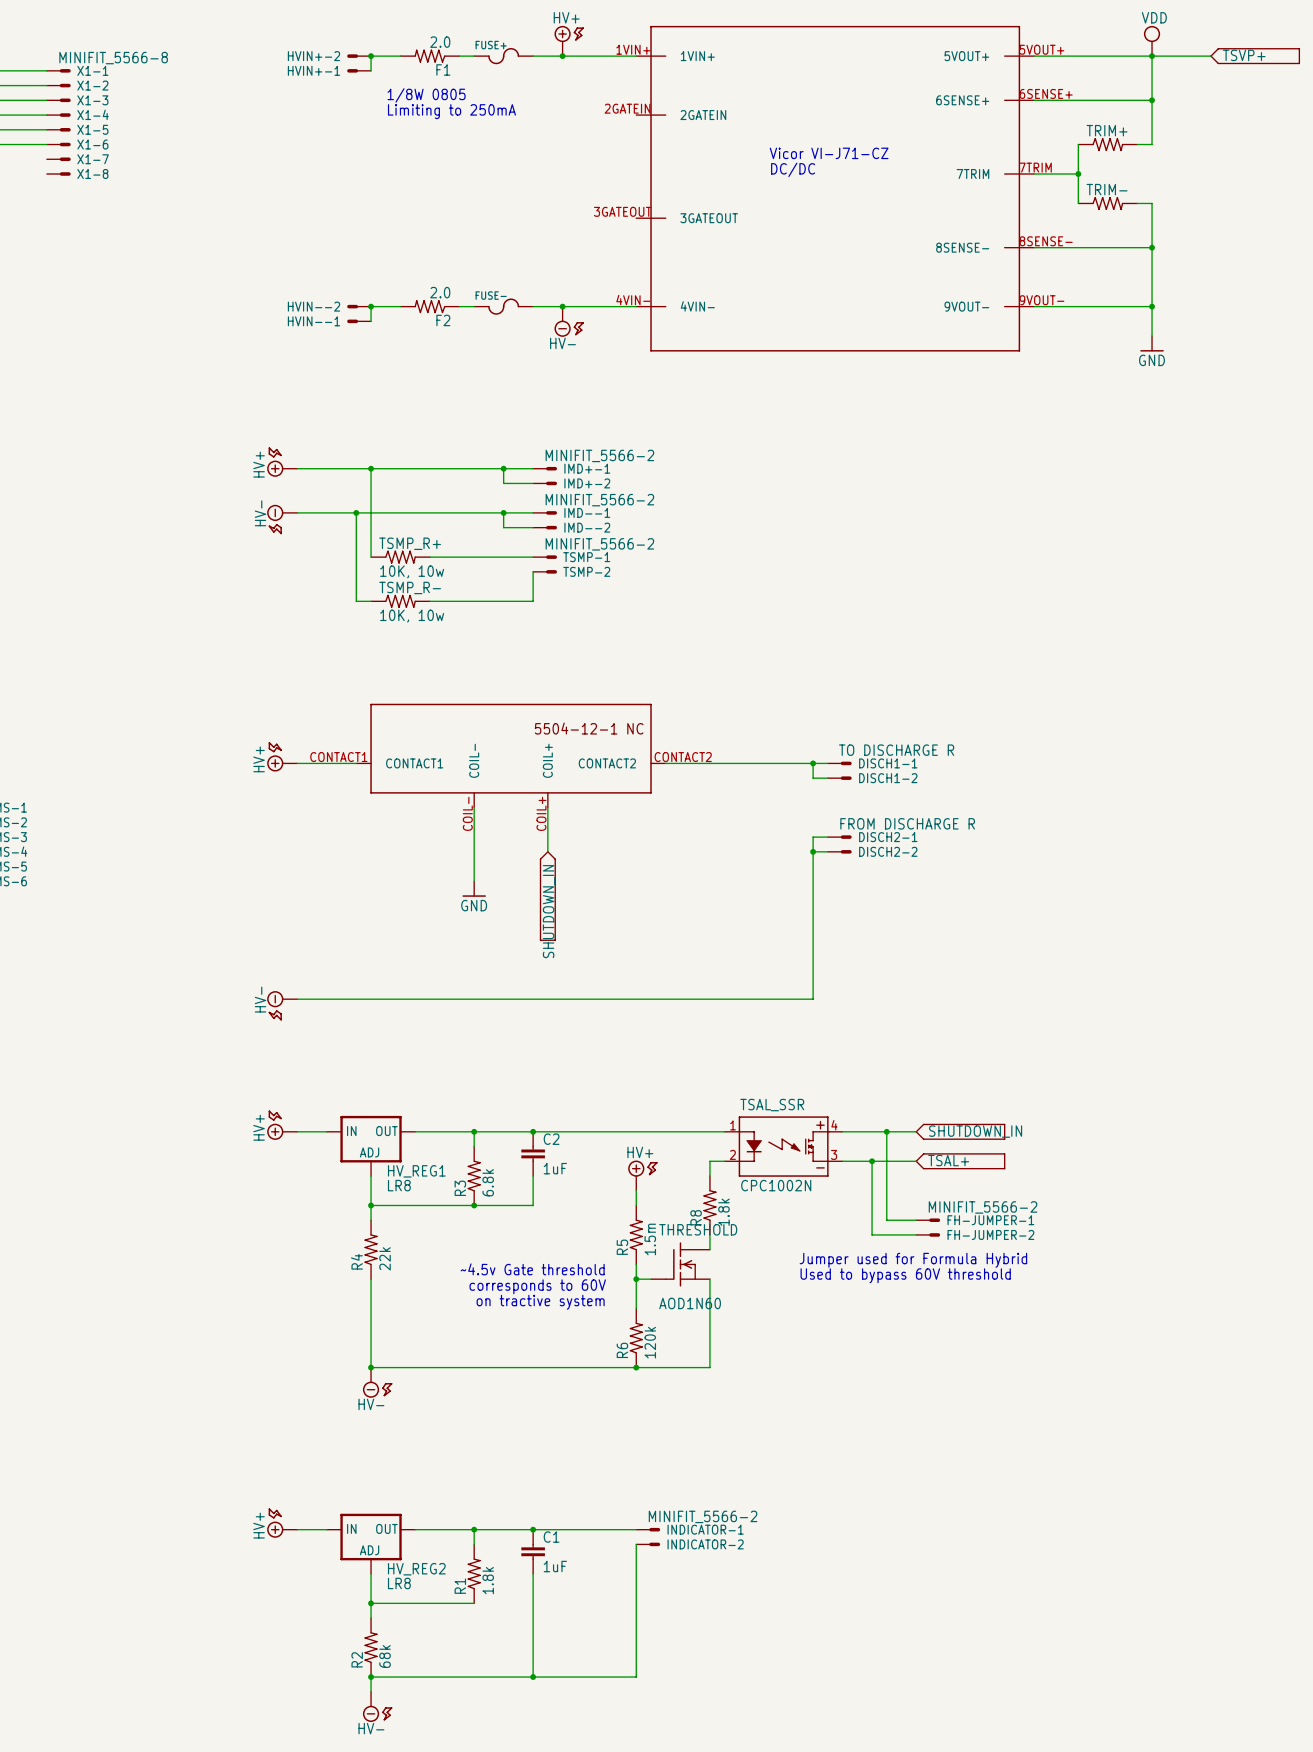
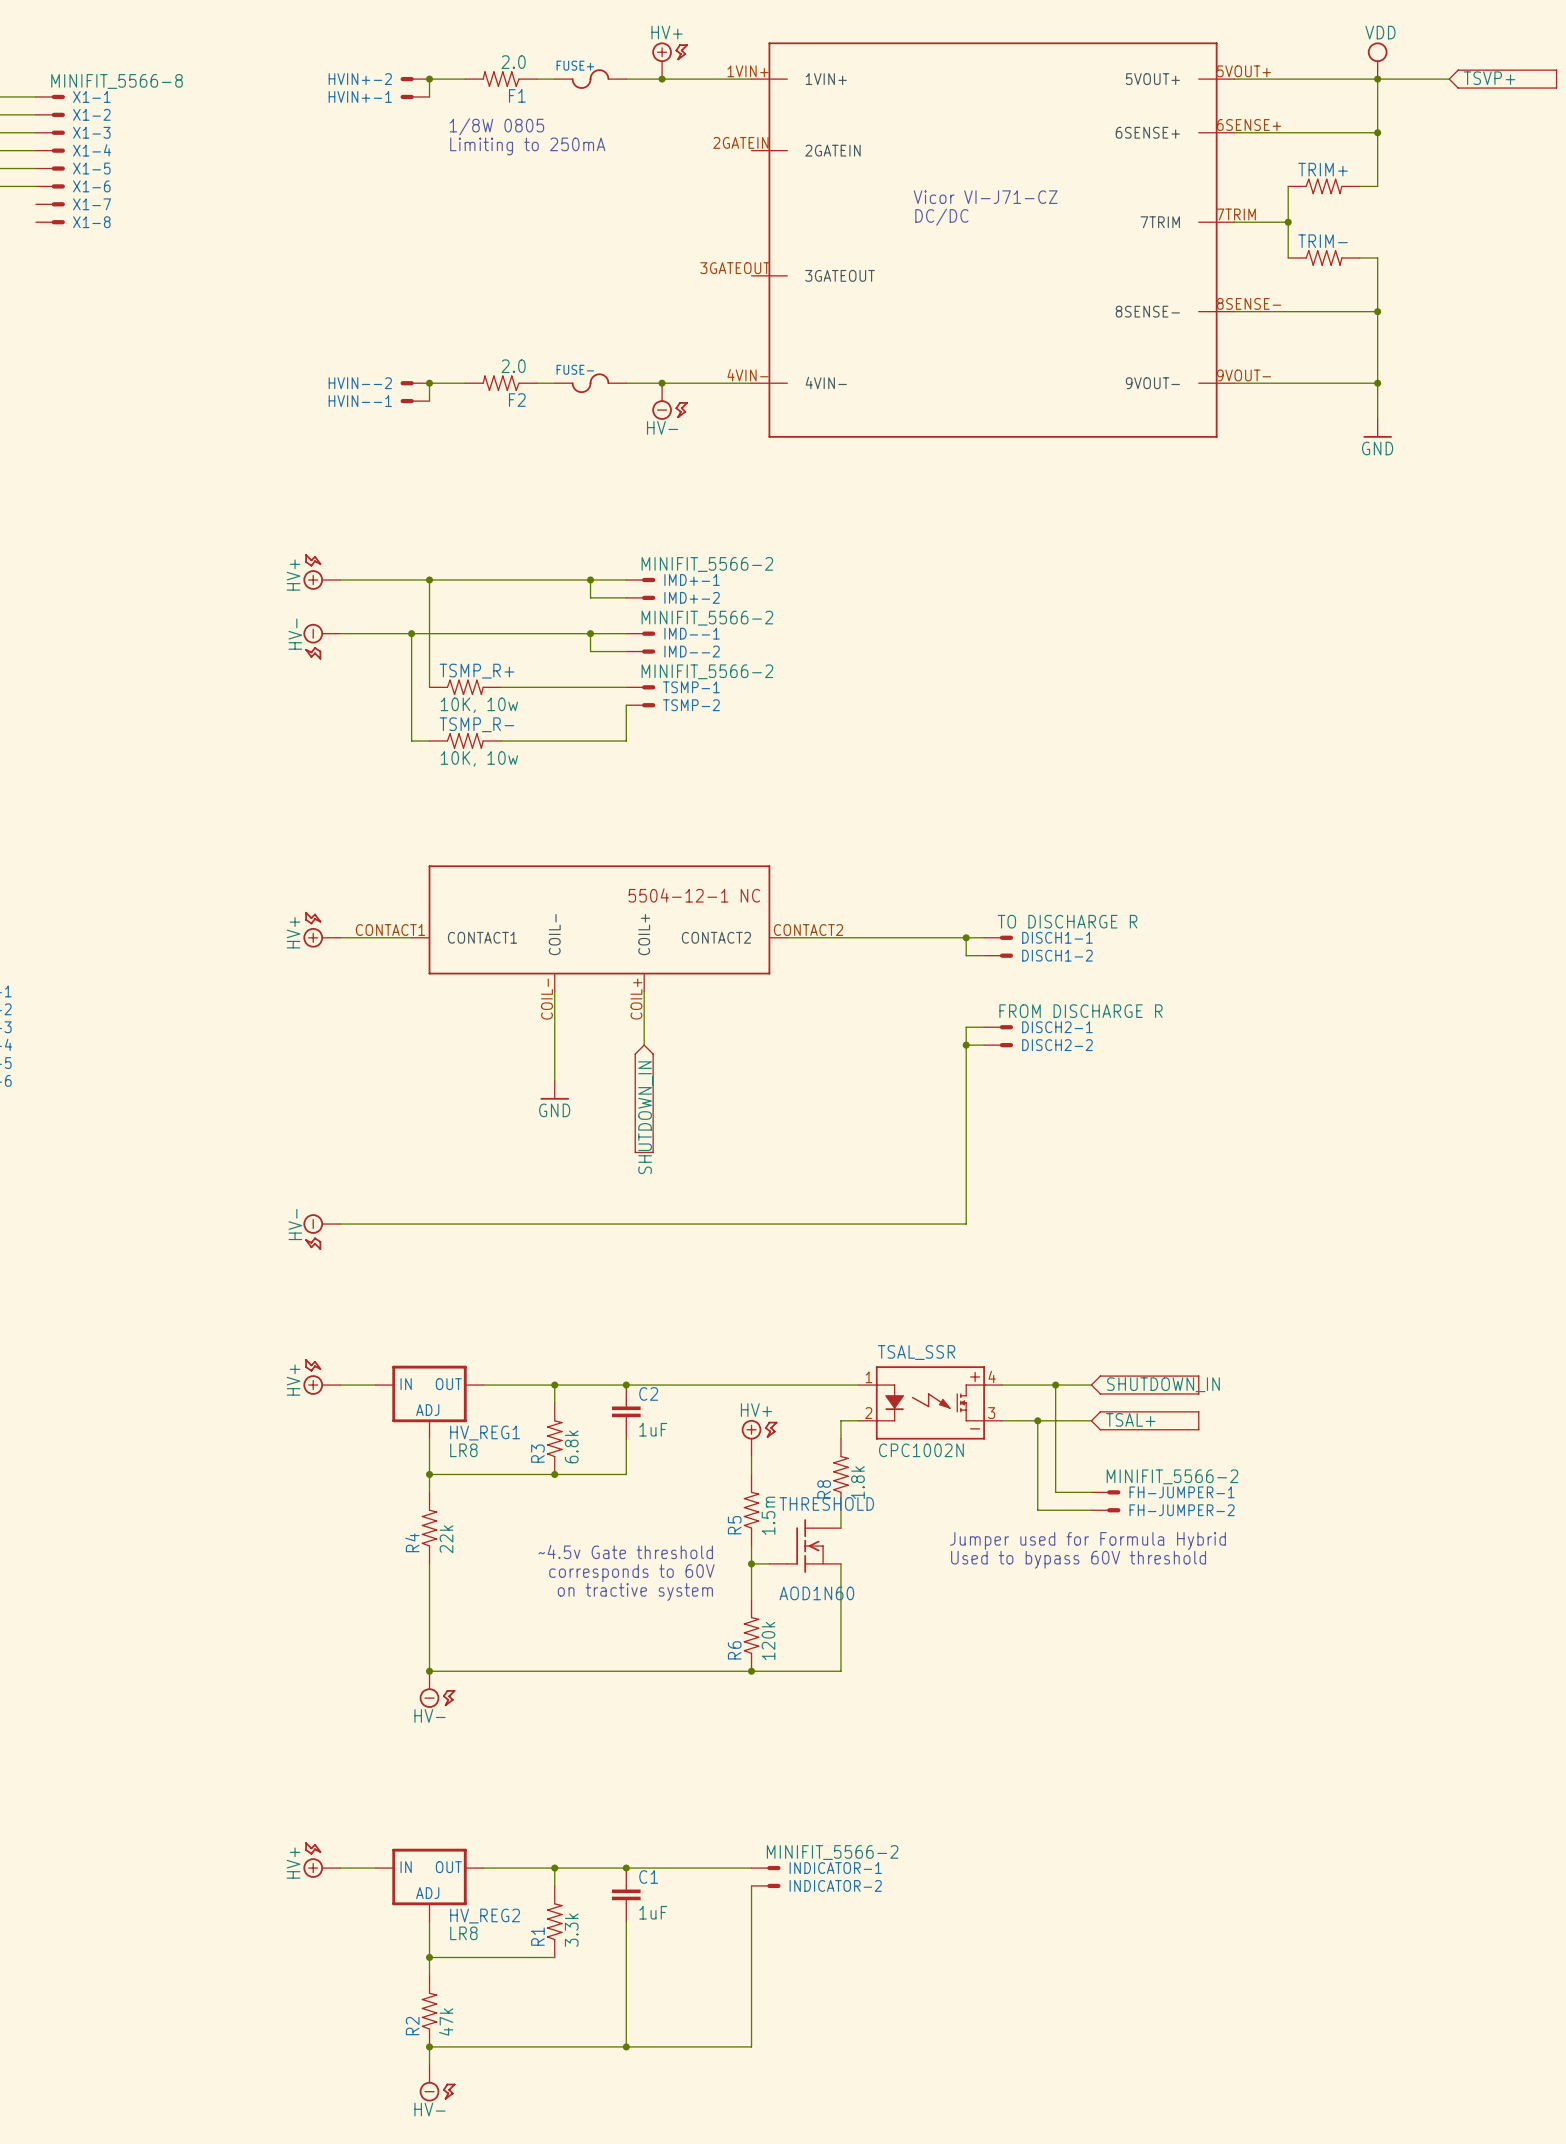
R1 value: 1.8k (488, 1580) -> 3.3k (571, 1930)
R2 value: 68k (385, 1656) -> 47k (446, 2022)

